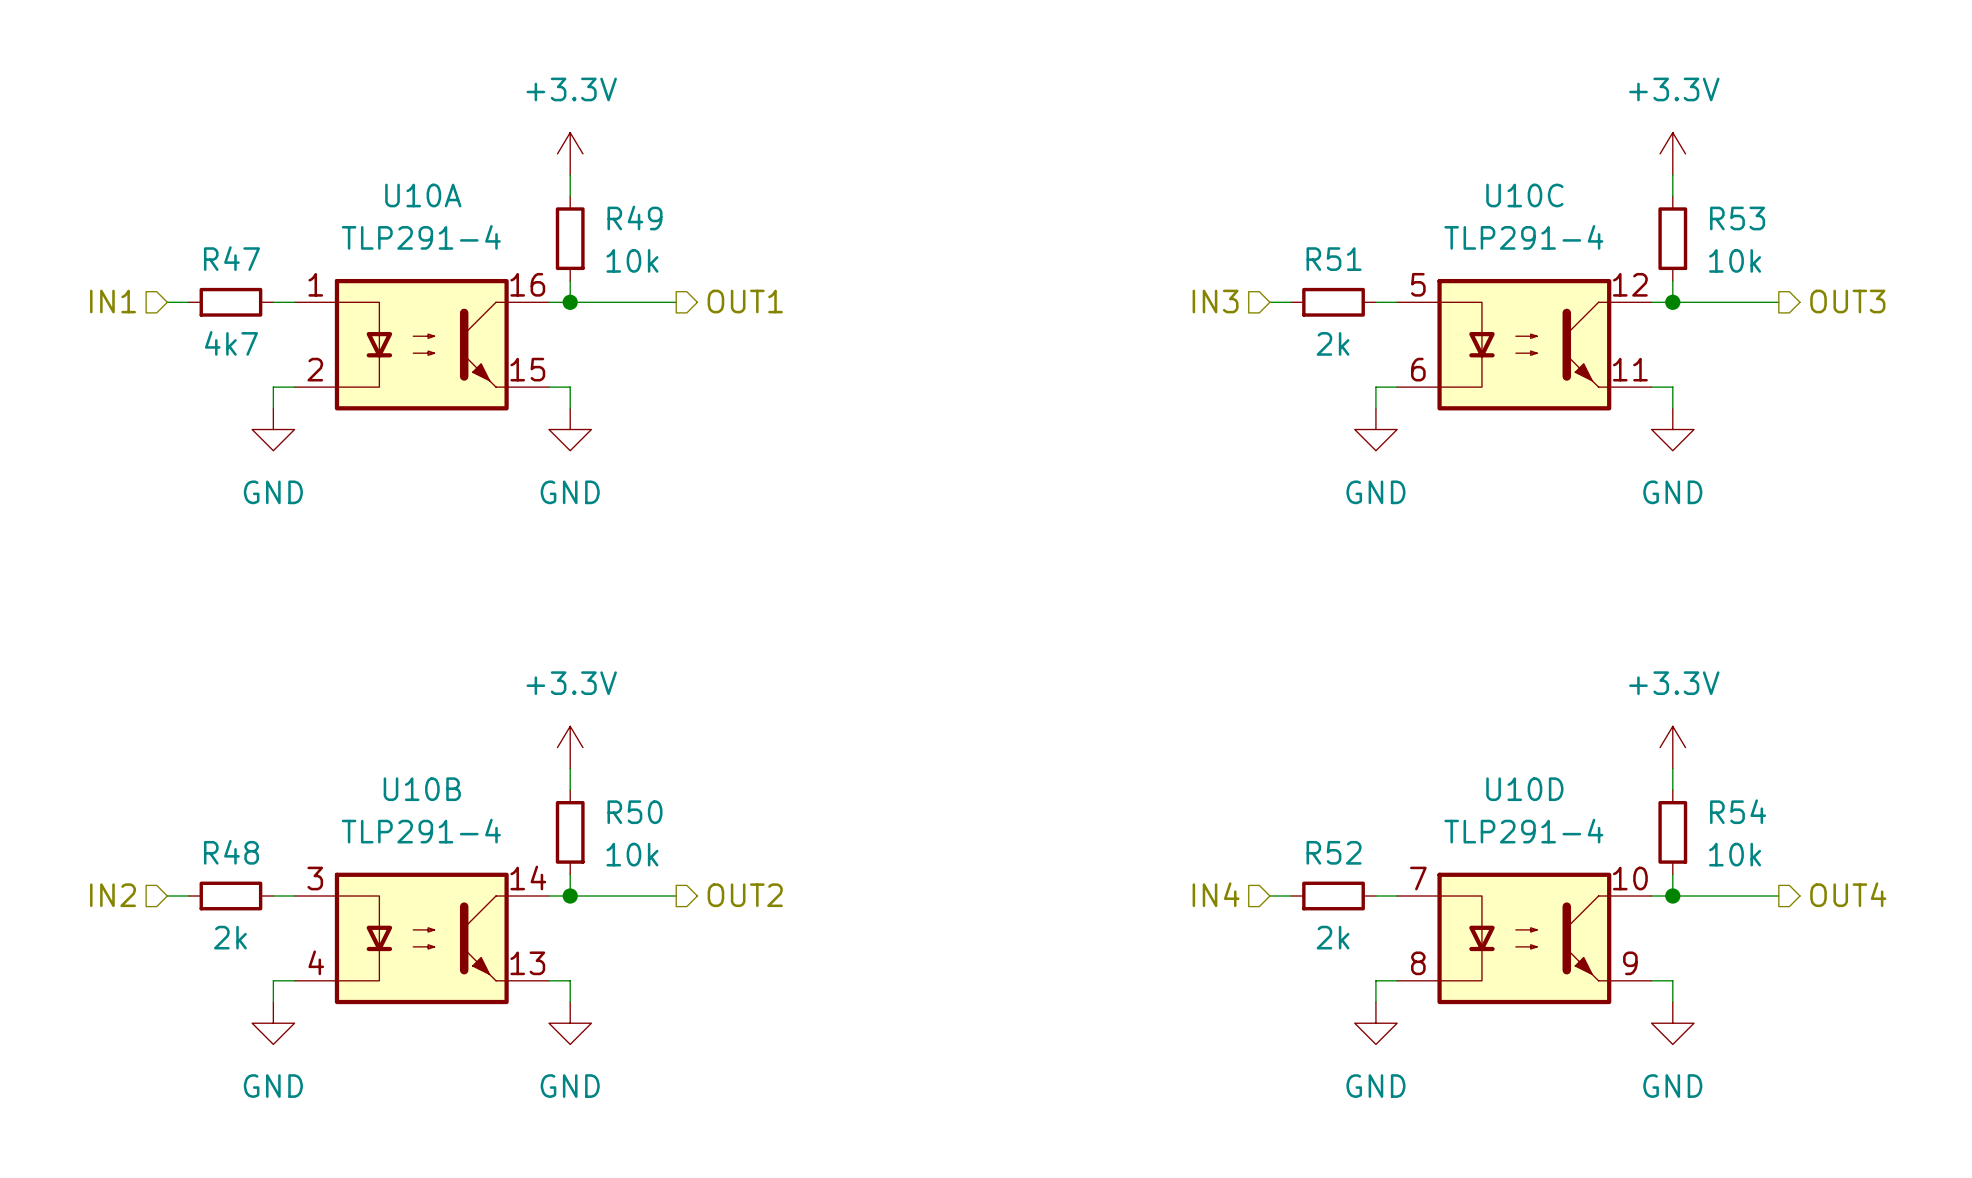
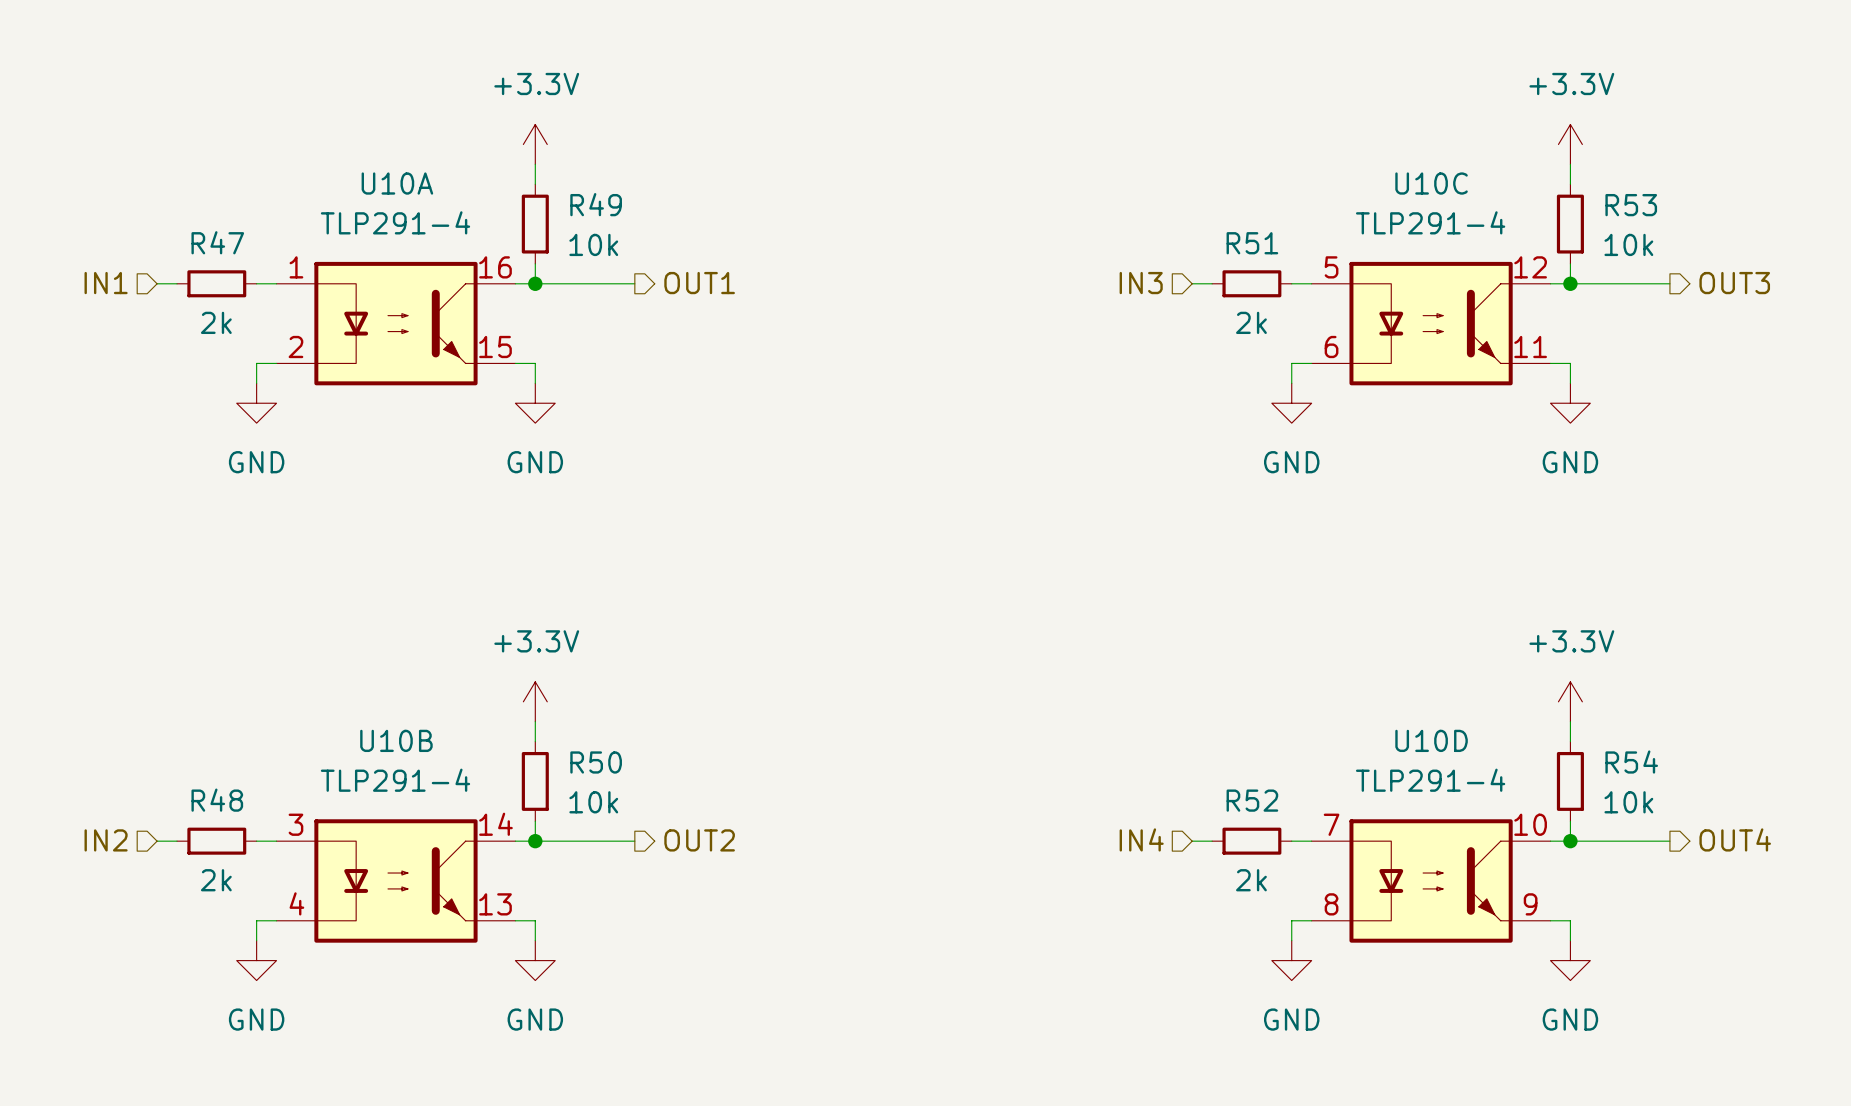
R47 value: 4k7 (231, 343) -> 2k (216, 322)

